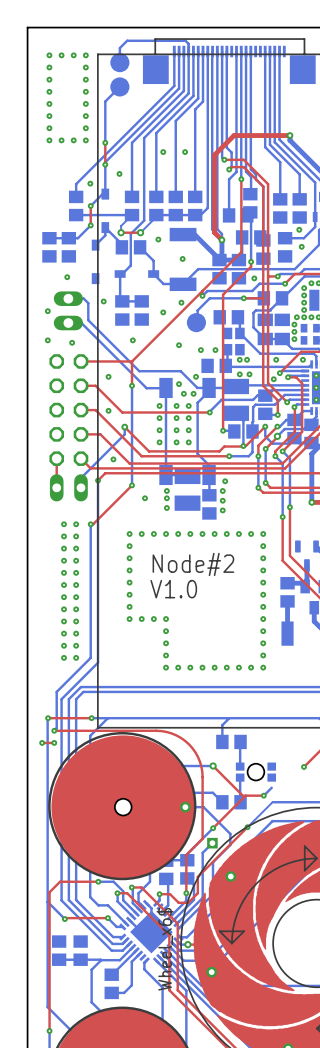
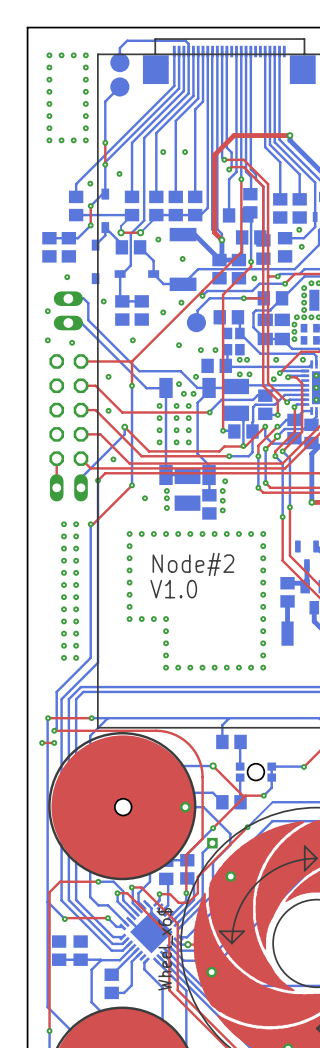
bottom track: none -> (303, 766) (271, 766) (271, 787)

